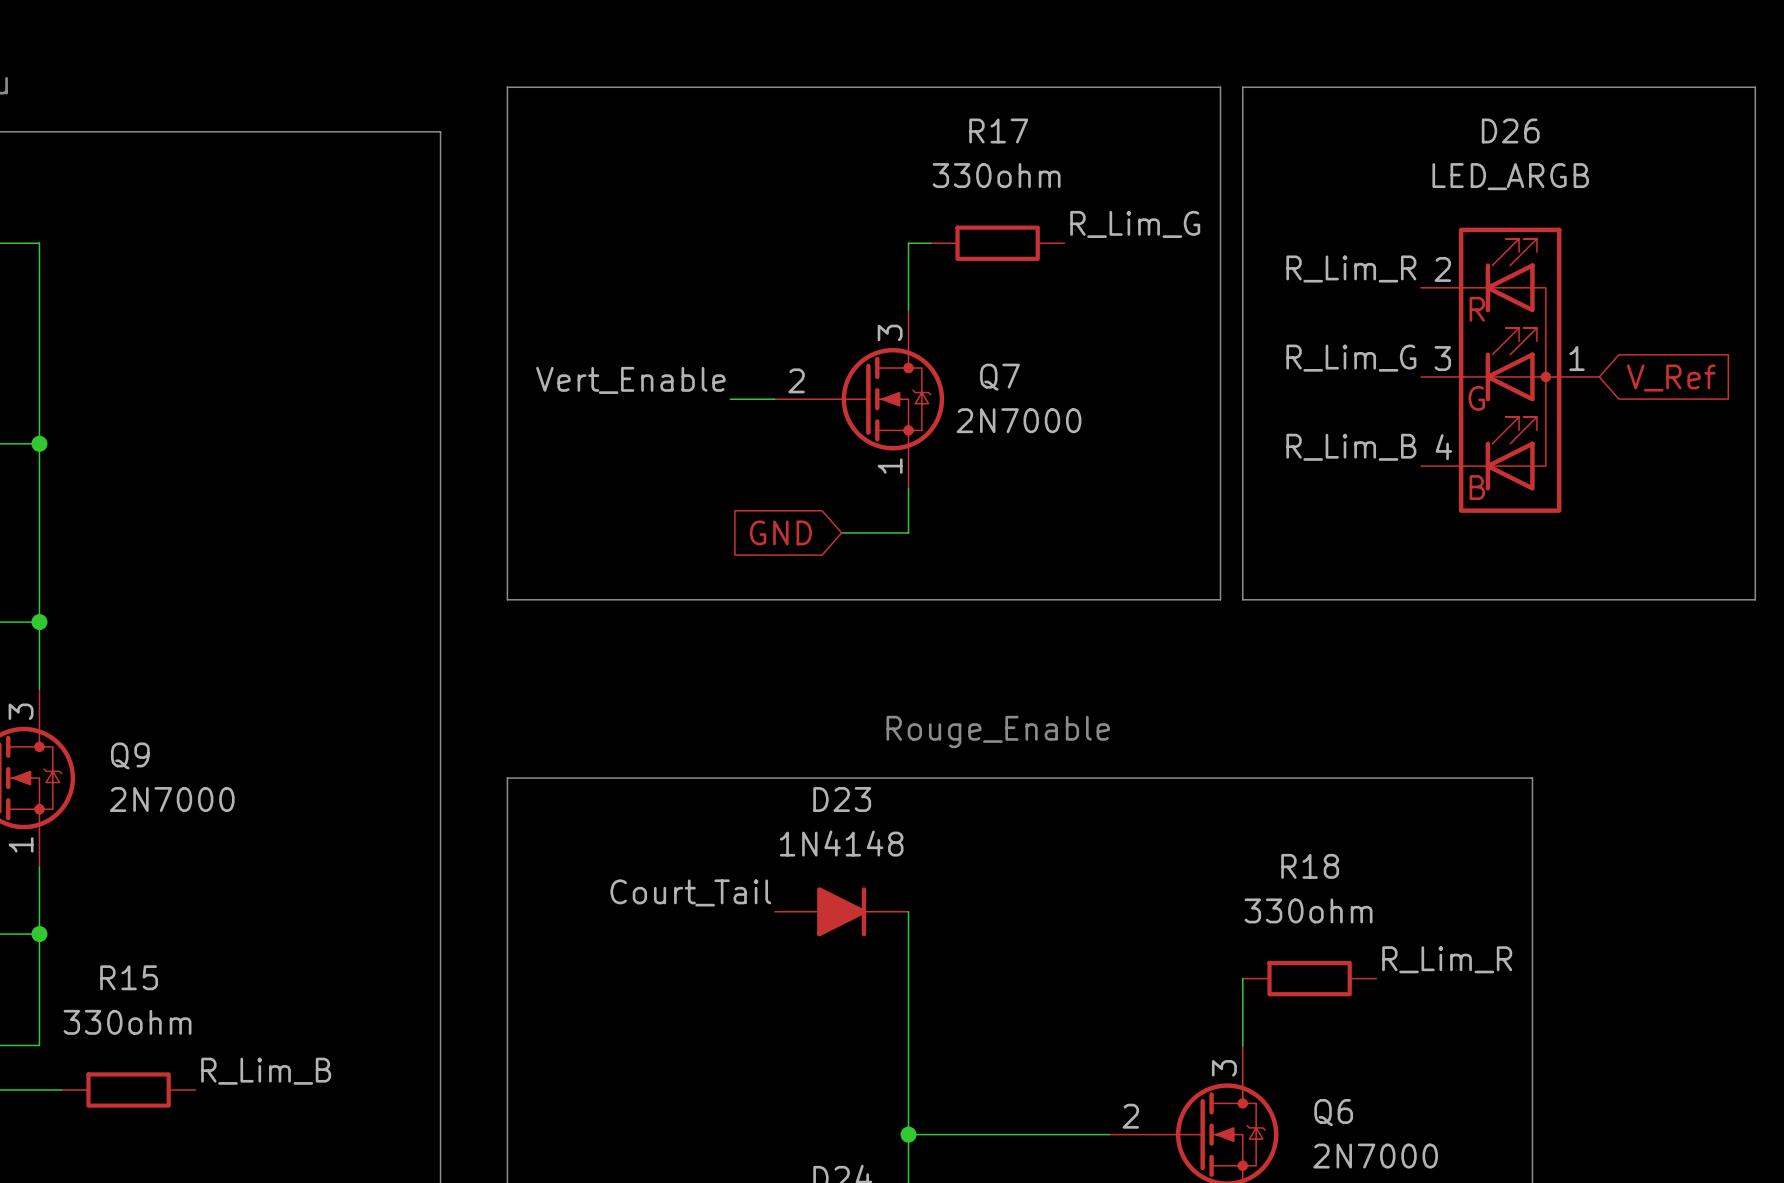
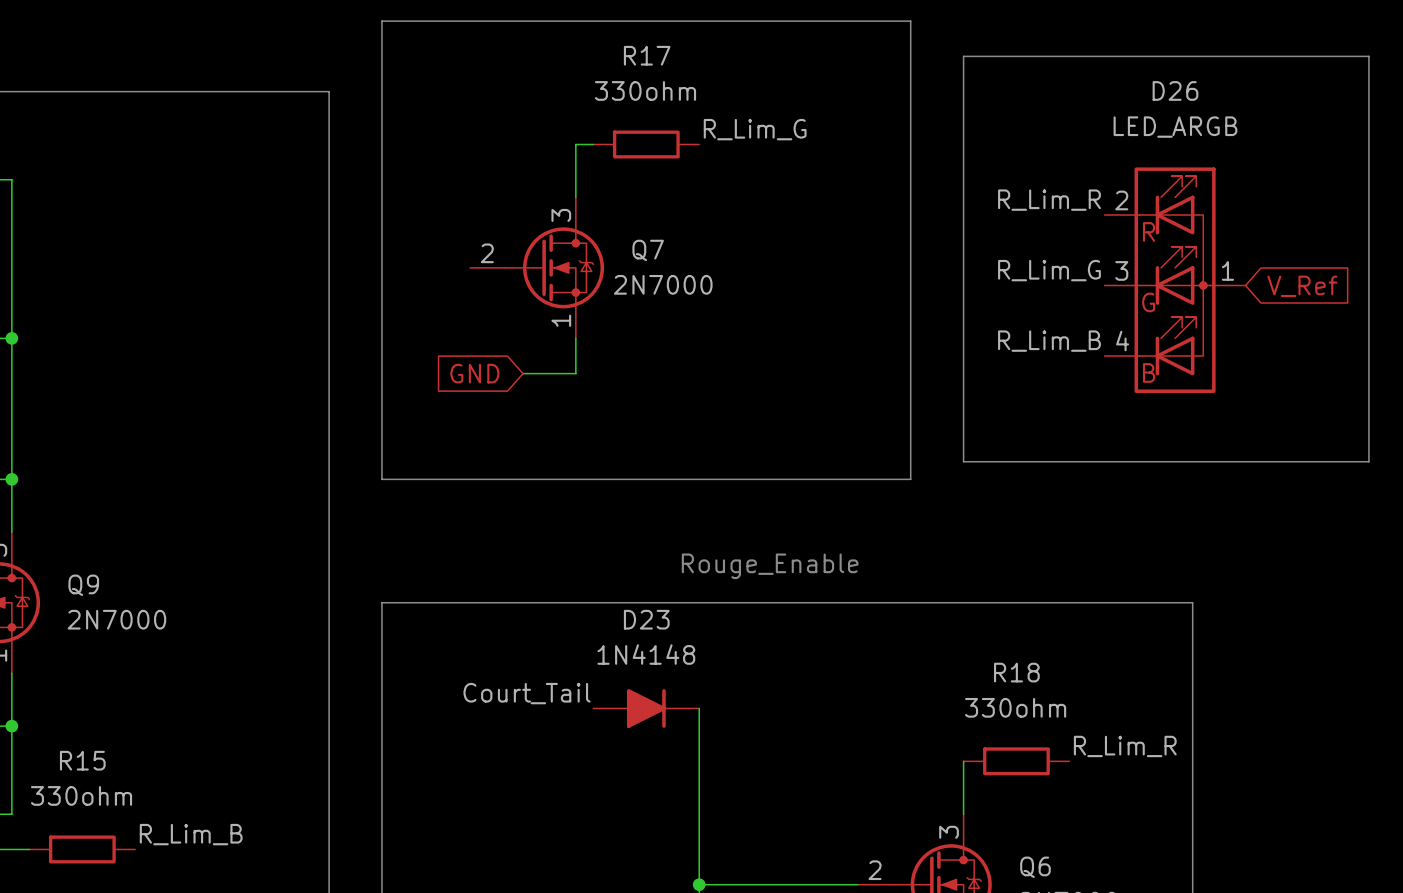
line: (507, 87) (1220, 87) (1220, 599) (507, 599) -> (381, 56) (381, 21) (910, 21) (910, 479) (381, 479) (381, 461)
label position: R_Lim_G (1135, 224) -> R_Lim_G (755, 129)
wire: (930, 243) (908, 243) (908, 310) -> (593, 144) (575, 144) (575, 197)
R17 position: (997, 243) -> (646, 144)
label: Vert_Enable (630, 380) -> none
wire: (730, 399) (774, 399) -> none
Q7 position: (859, 399) -> (537, 267)
wire: (908, 488) (908, 532) (841, 532) -> (575, 338) (575, 373) (522, 373)
global label position: GND (780, 532) -> GND (474, 373)

